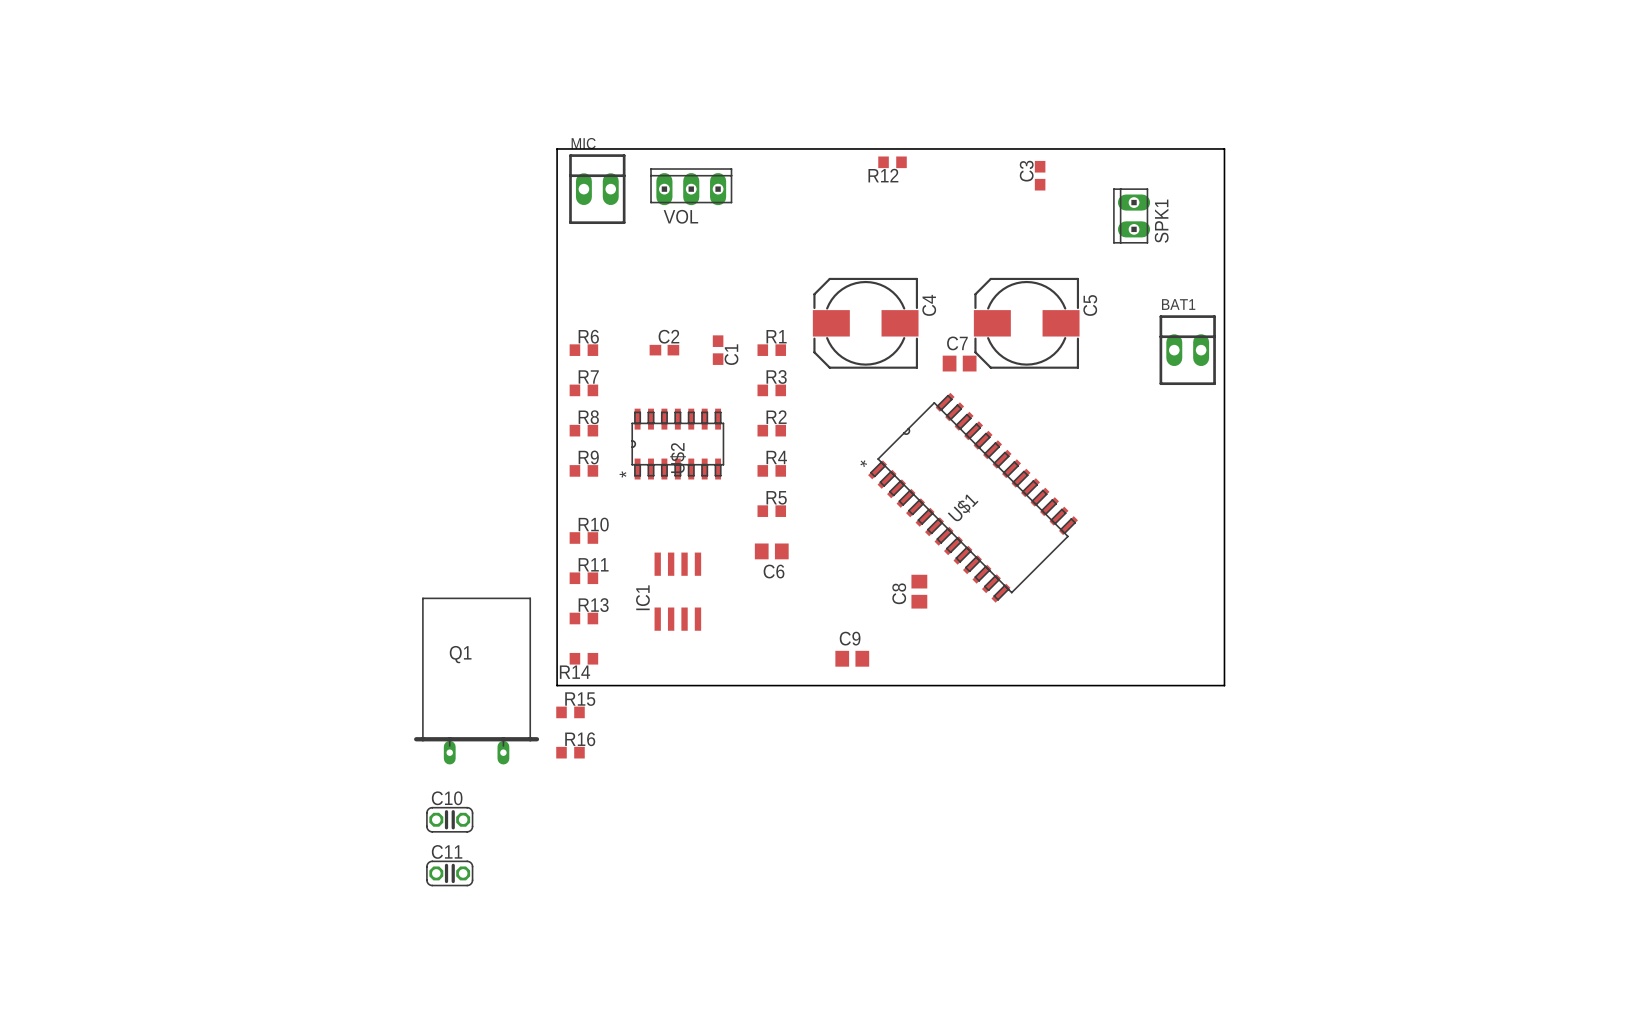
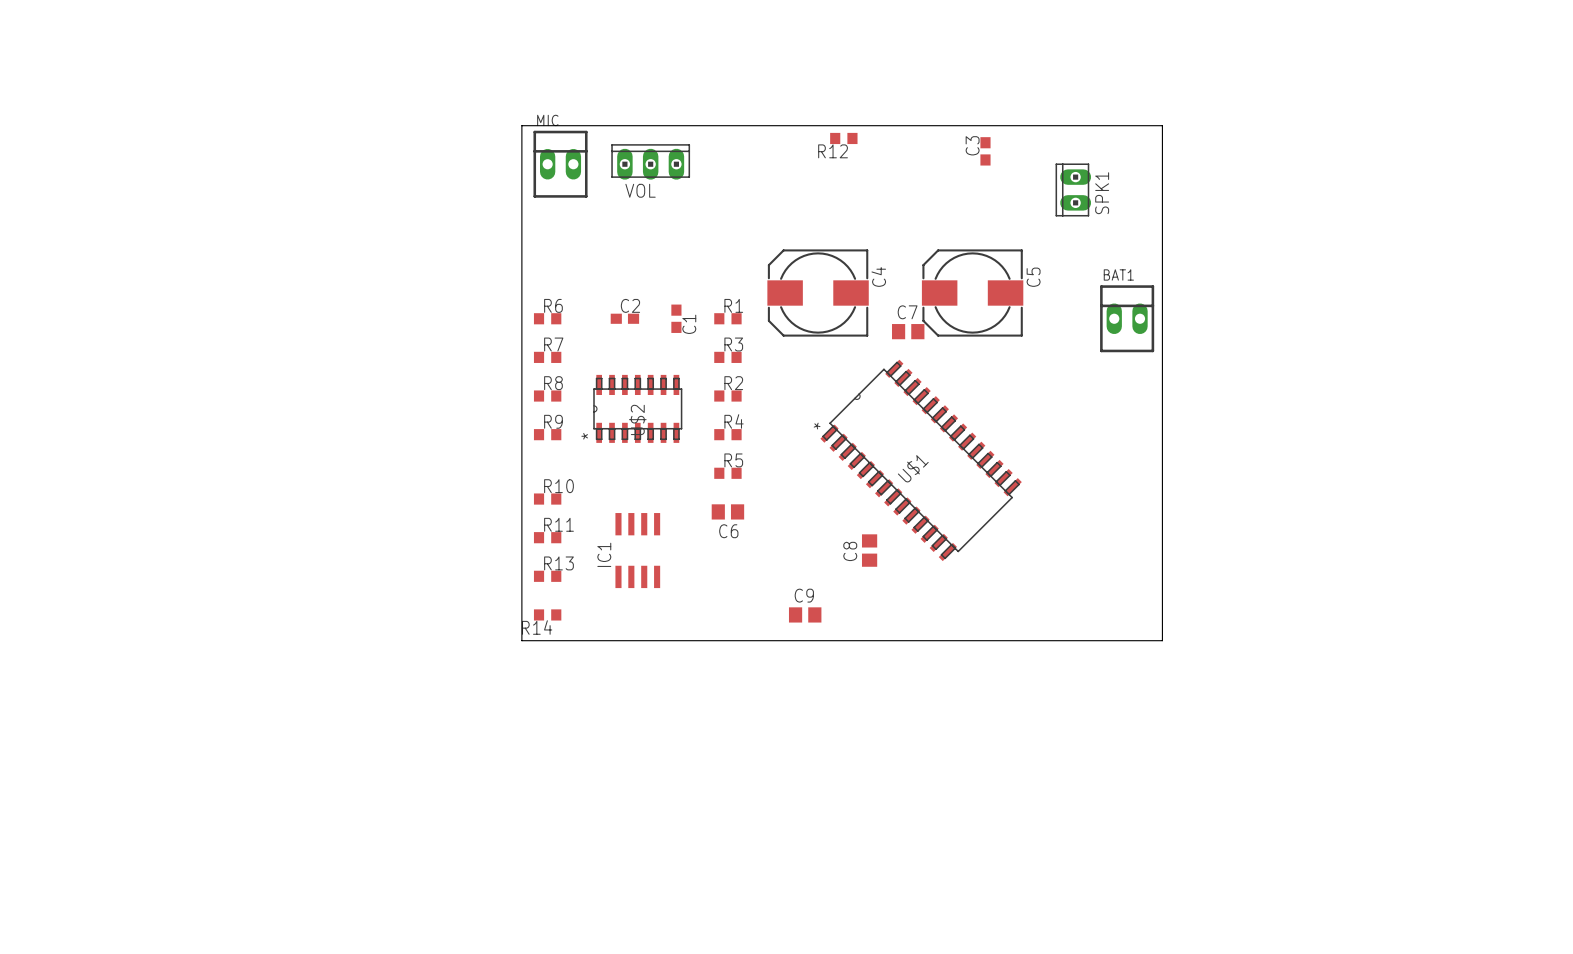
Q1: (476, 681) -> none
R15: (570, 712) -> none
R16: (570, 752) -> none
C10: (449, 819) -> none
C11: (449, 873) -> none

